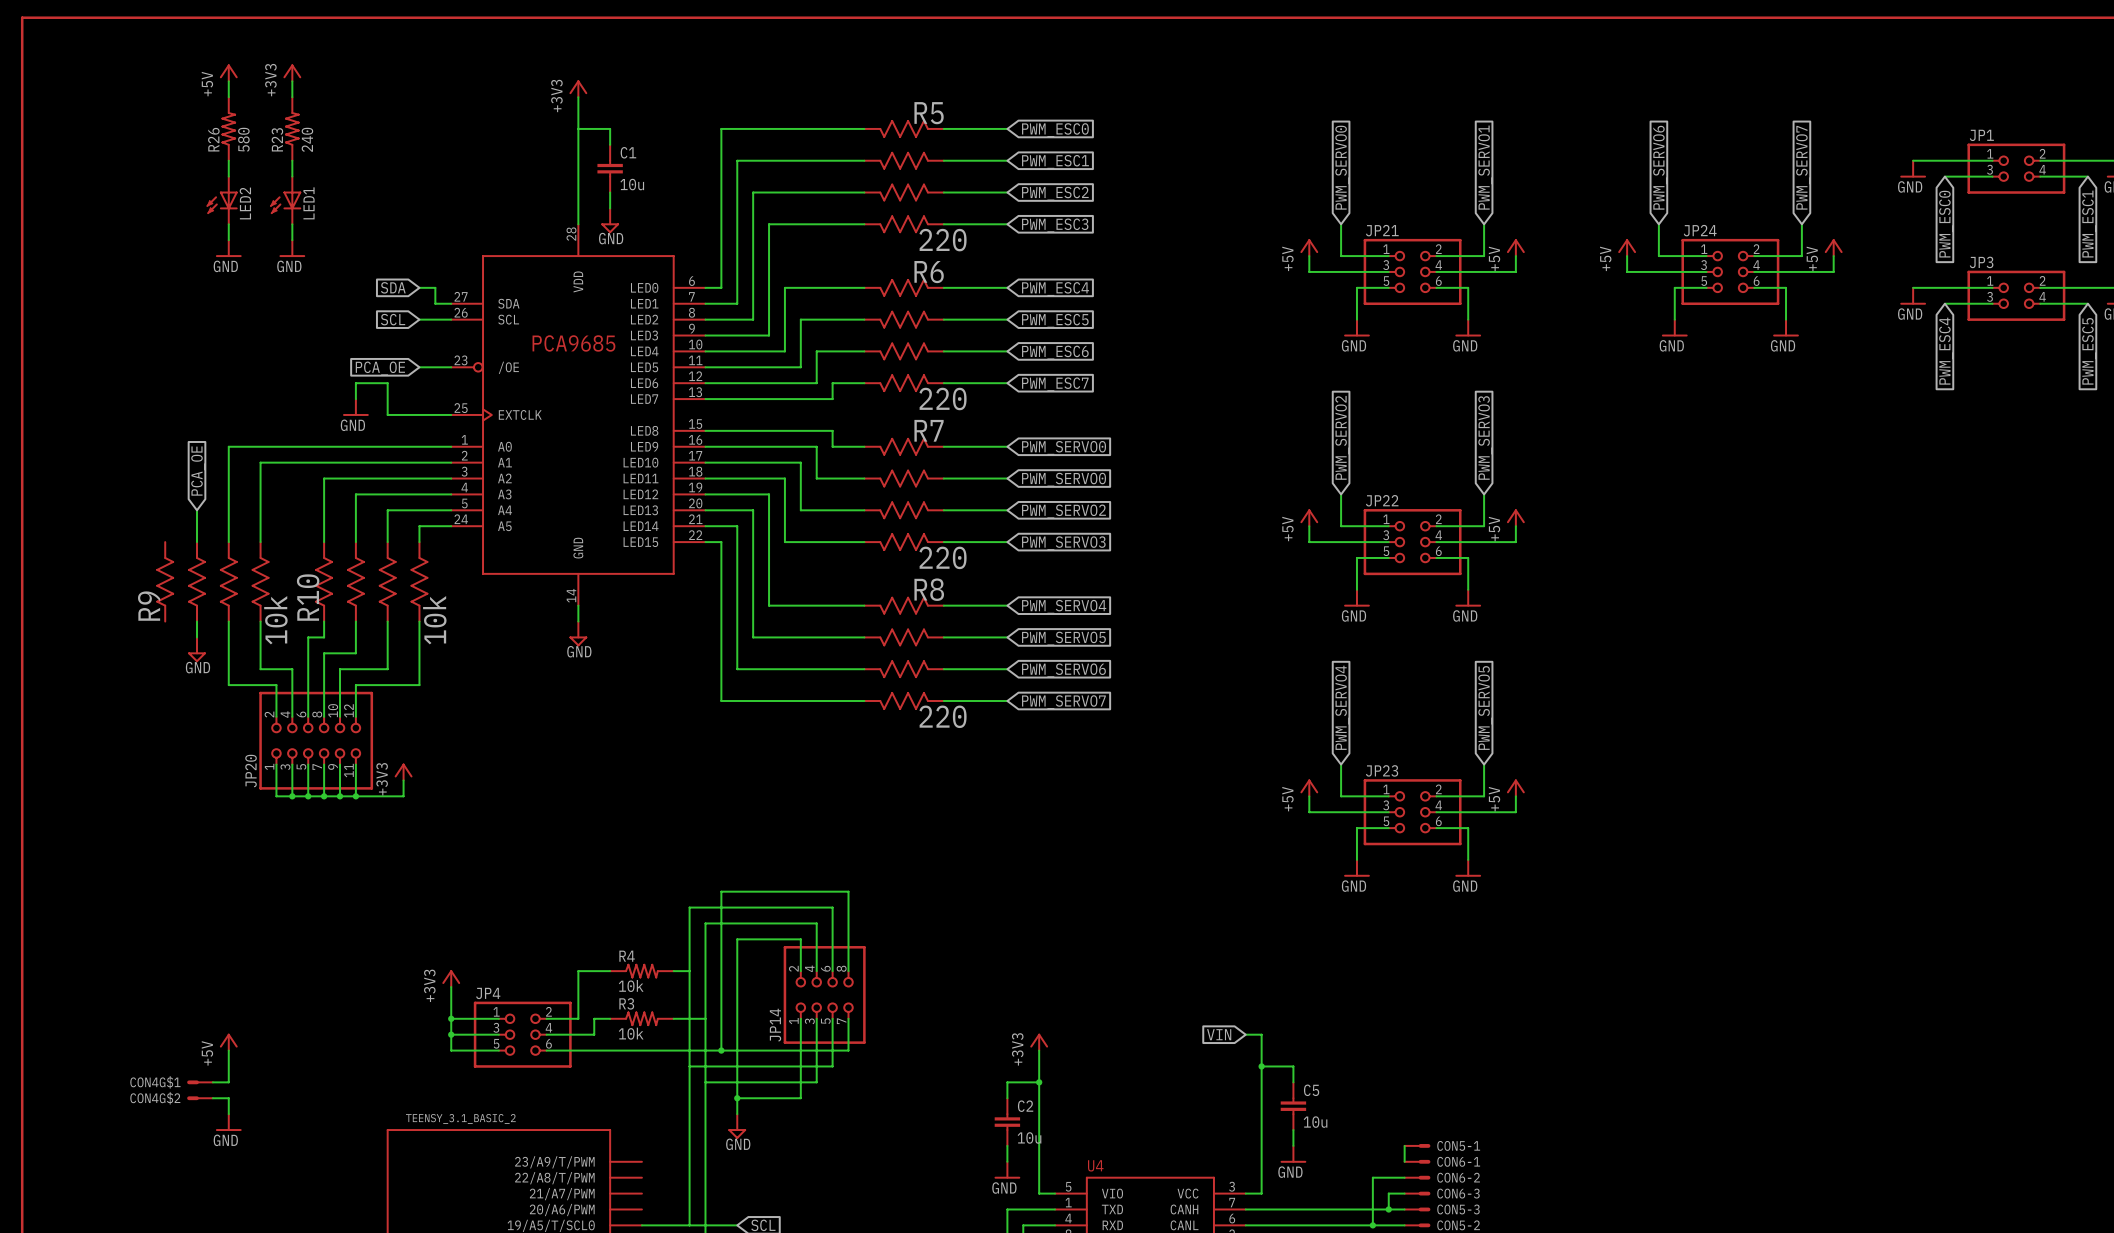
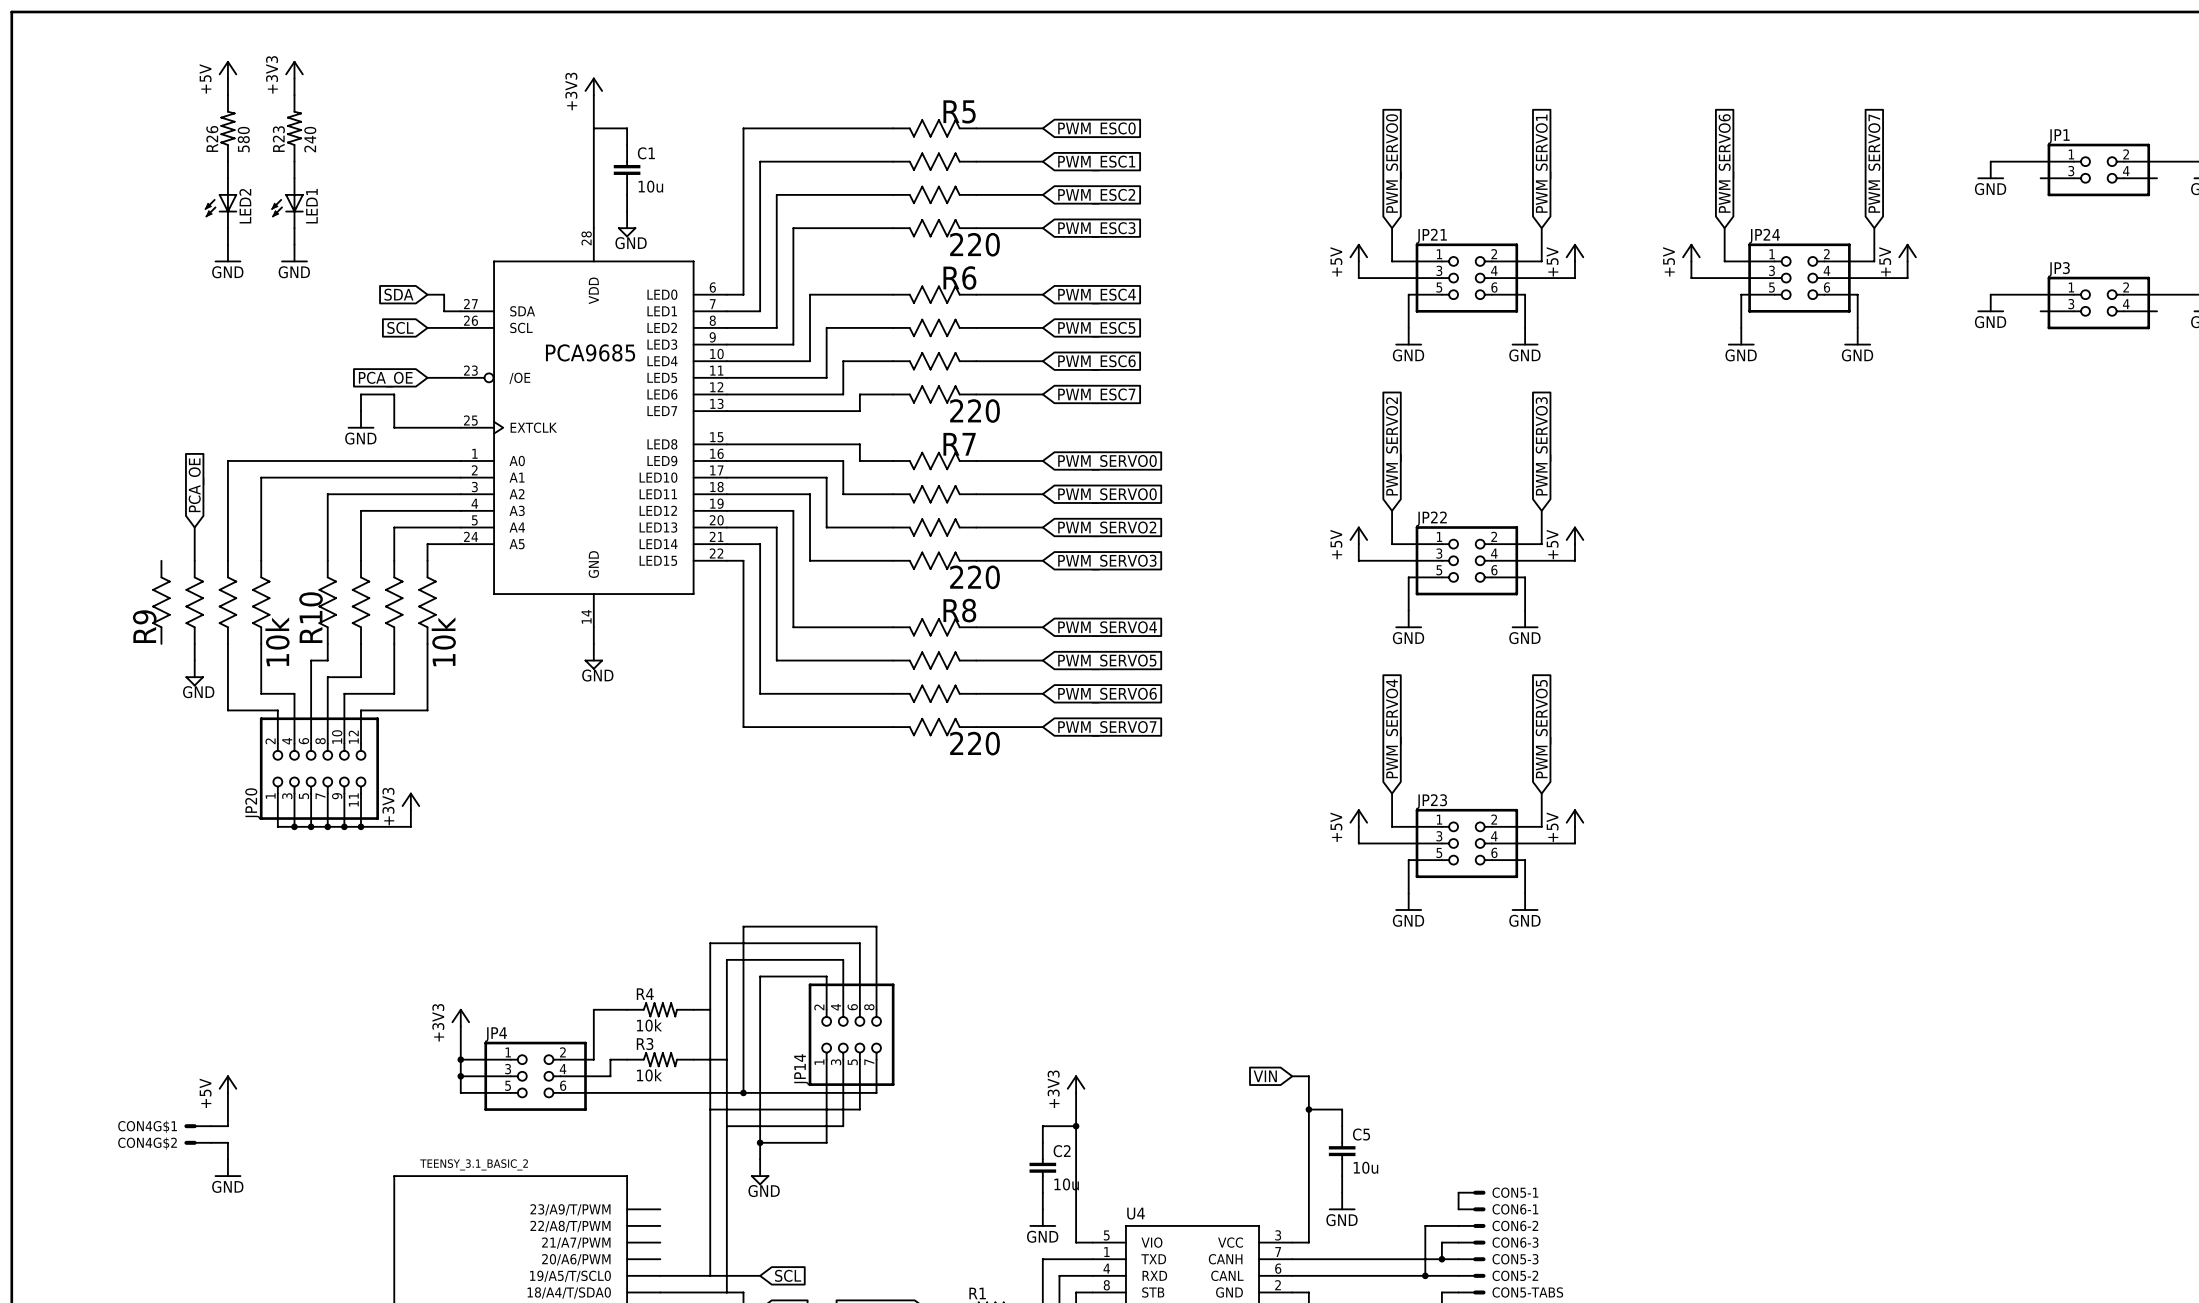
wire: (1944, 176) (1960, 176) -> none
wire: (2072, 176) (2087, 176) -> none
global label: PWM_ESC0 (1946, 224) -> none
global label: PWM_ESC1 (2089, 224) -> none
wire: (1944, 303) (1960, 303) -> none
wire: (2072, 303) (2087, 303) -> none
global label: PWM_ESC4 (1946, 351) -> none
global label: PWM_ESC5 (2089, 351) -> none

